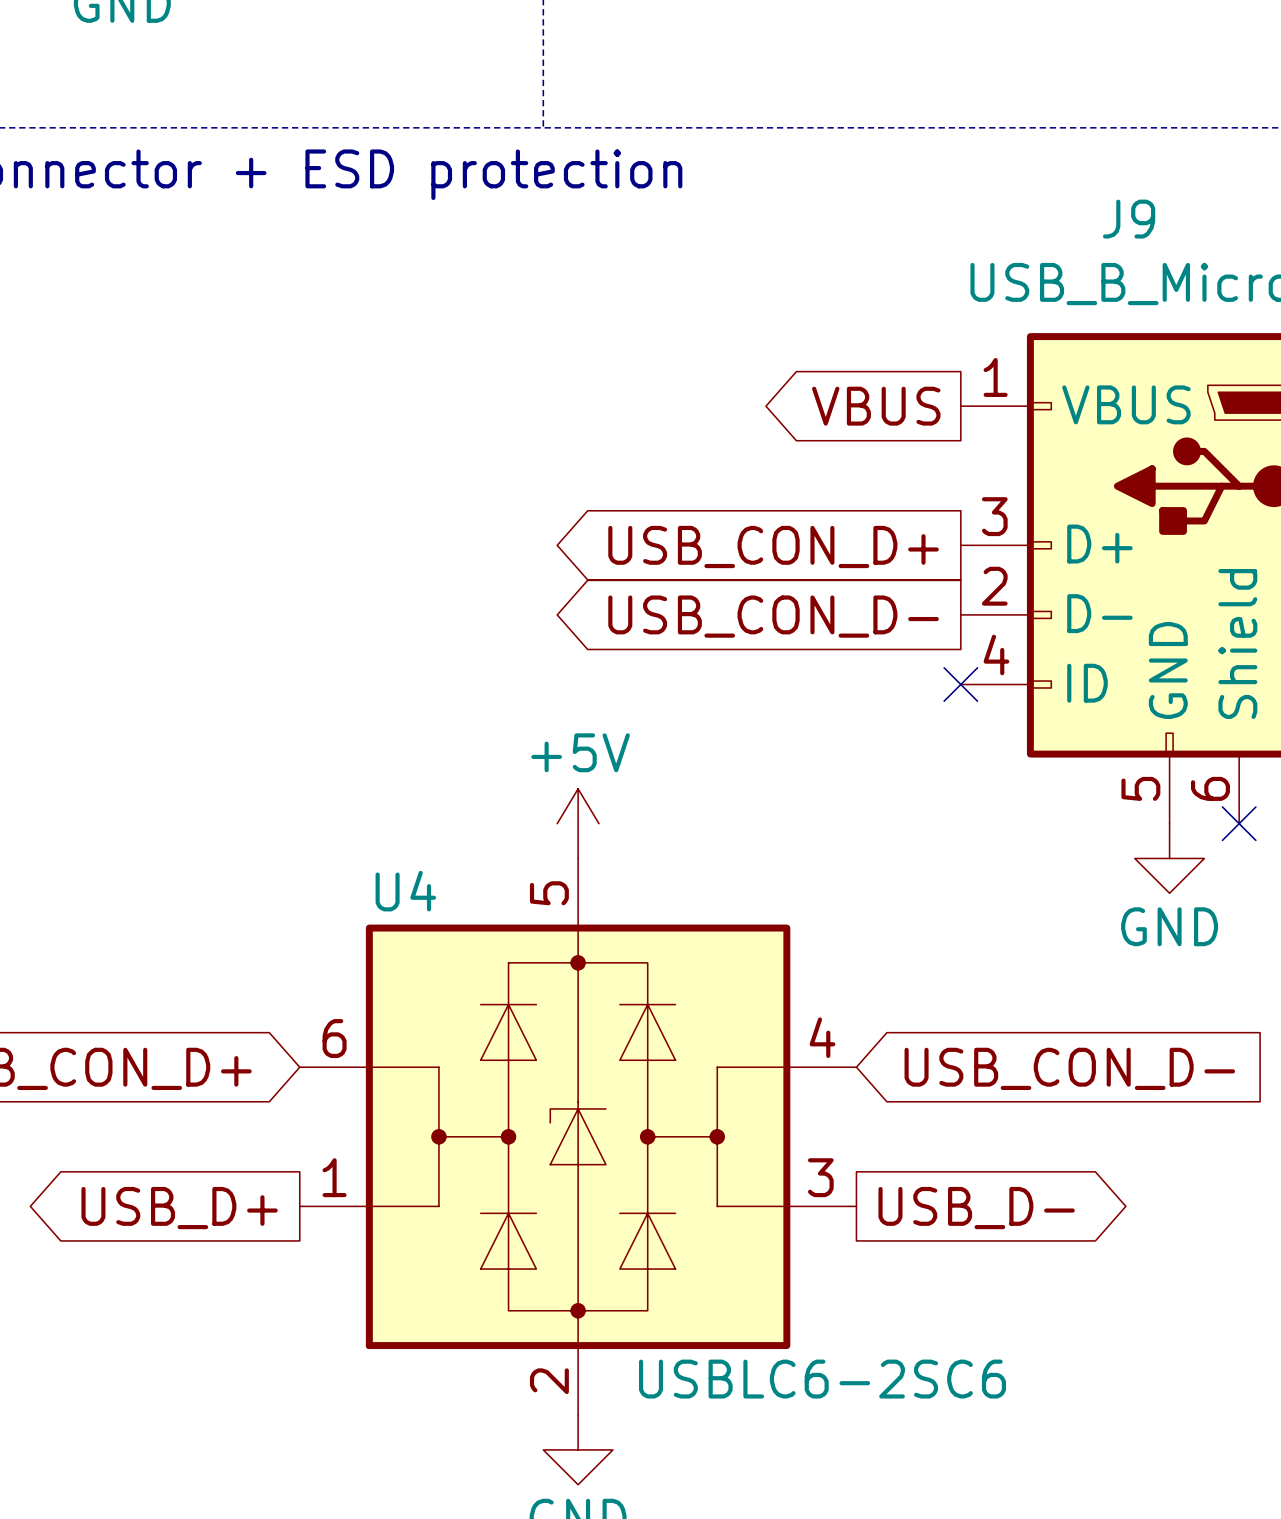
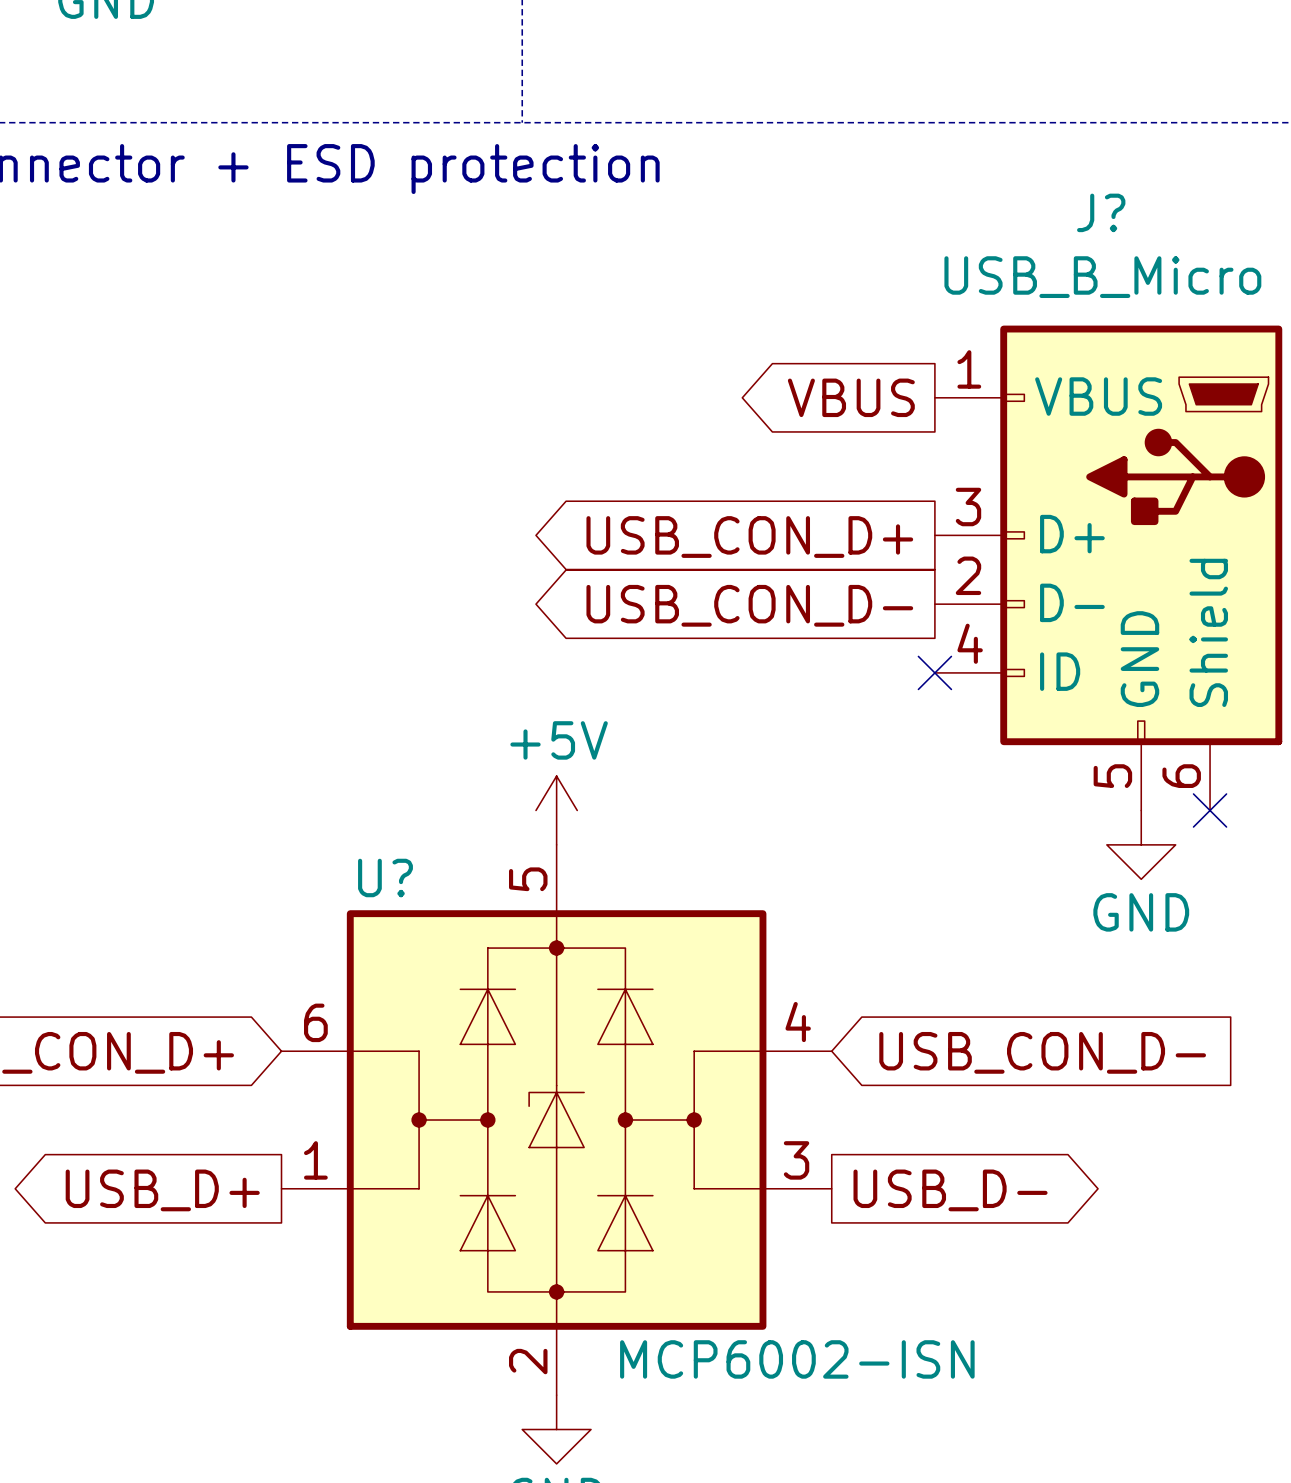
J9 name: J9 (1129, 219) -> J? (1101, 212)
U4 name: U4 (405, 891) -> U? (385, 877)
U4 value: USBLC6-2SC6 (822, 1379) -> MCP6002-ISN (797, 1359)

